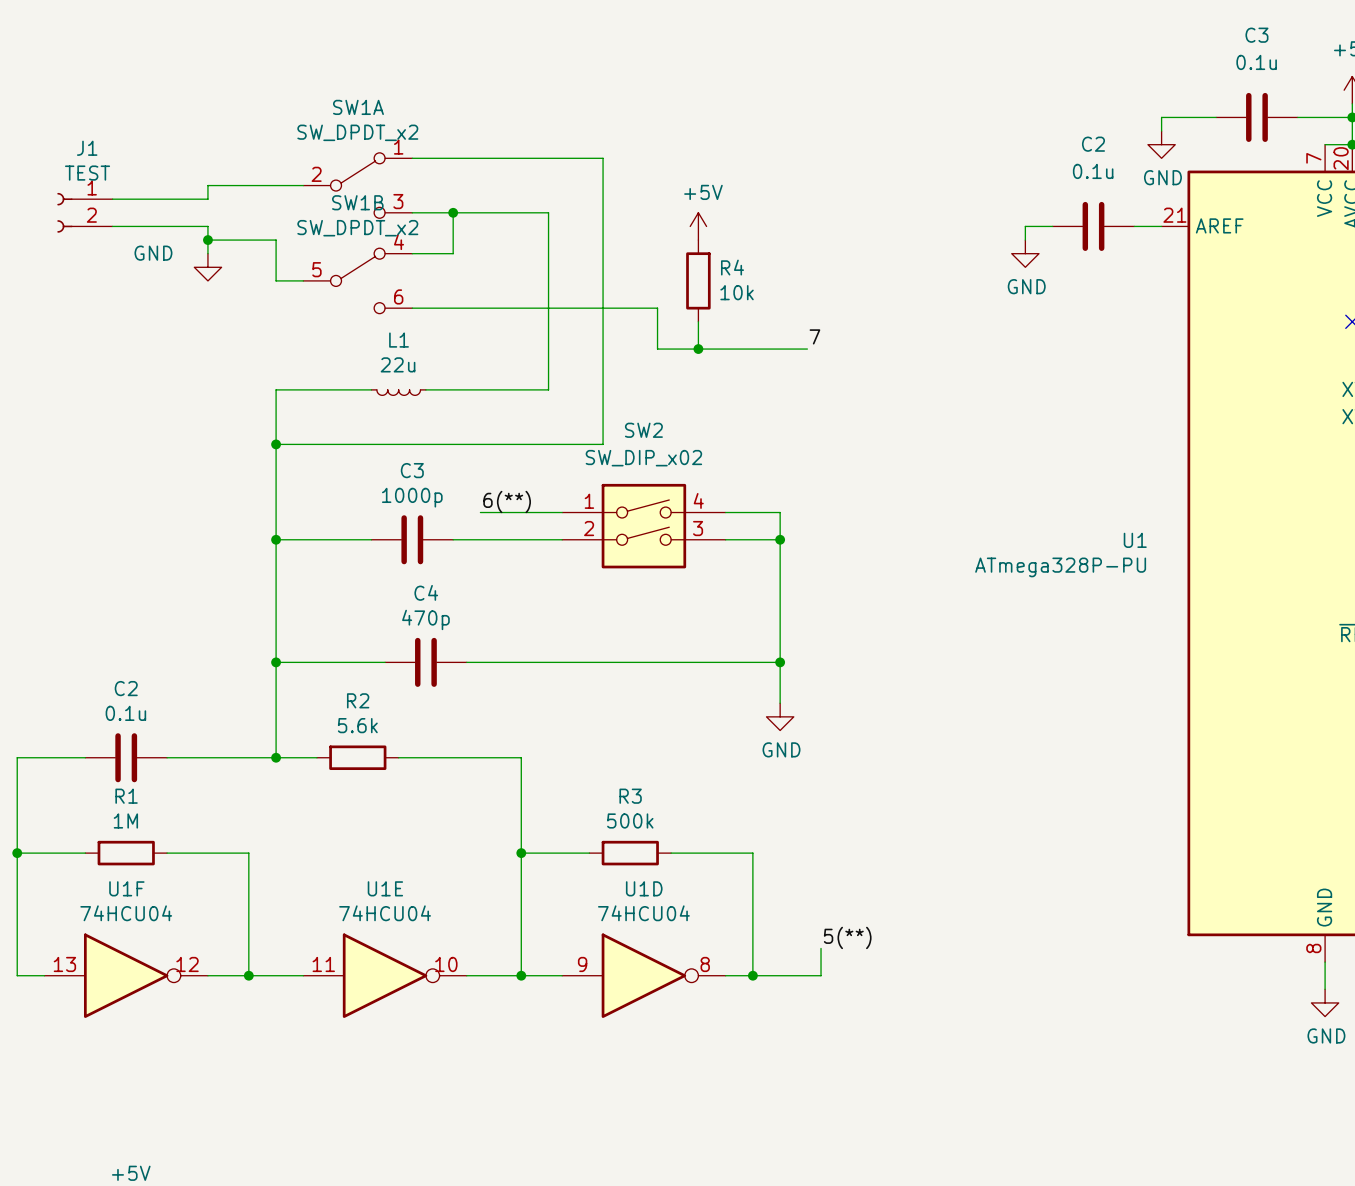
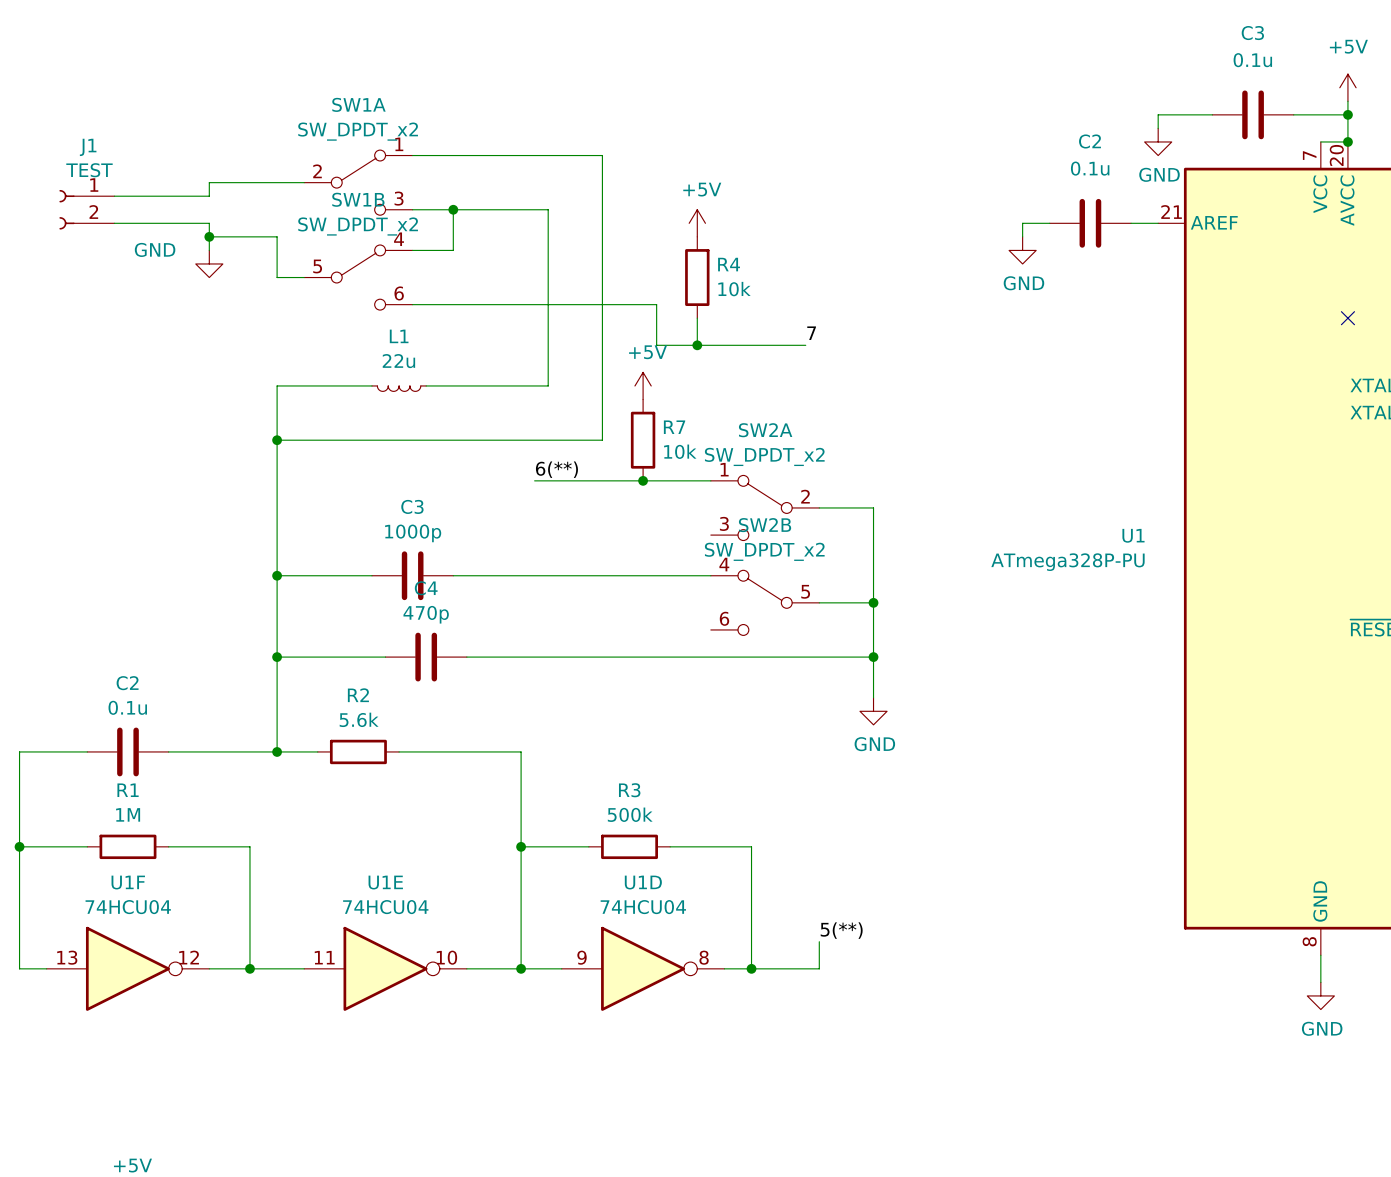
power symbol: none -> +5V (643, 385)
R7: none -> 10k (643, 440)
wire: none -> (534, 480) (710, 480)
junction: none -> (643, 480)
label position: 6(**) (507, 501) -> 6(**) (556, 469)
wire: (480, 512) (562, 512) -> none
wire: (725, 512) (780, 512) (780, 703) -> (819, 507) (873, 507) (873, 697)
SW2A: none -> SW_DPDT_x2 (765, 507)
SW2: SW_DIP_x02 (643, 526) -> none
wire: (276, 539) (371, 539) -> (277, 575) (371, 575)
junction position: (276, 539) -> (277, 575)
C3 position: (412, 539) -> (412, 575)
wire: (453, 539) (562, 539) -> none
wire: (725, 539) (780, 539) -> (819, 602) (873, 602)
junction: (780, 539) -> none
wire: none -> (453, 575) (710, 575)
SW2B: none -> SW_DPDT_x2 (765, 602)
junction: none -> (873, 602)
wire: none -> (778, 657) (873, 657)
junction: (780, 662) -> none
junction: none -> (873, 657)
power symbol position: GND (780, 716) -> GND (873, 711)

